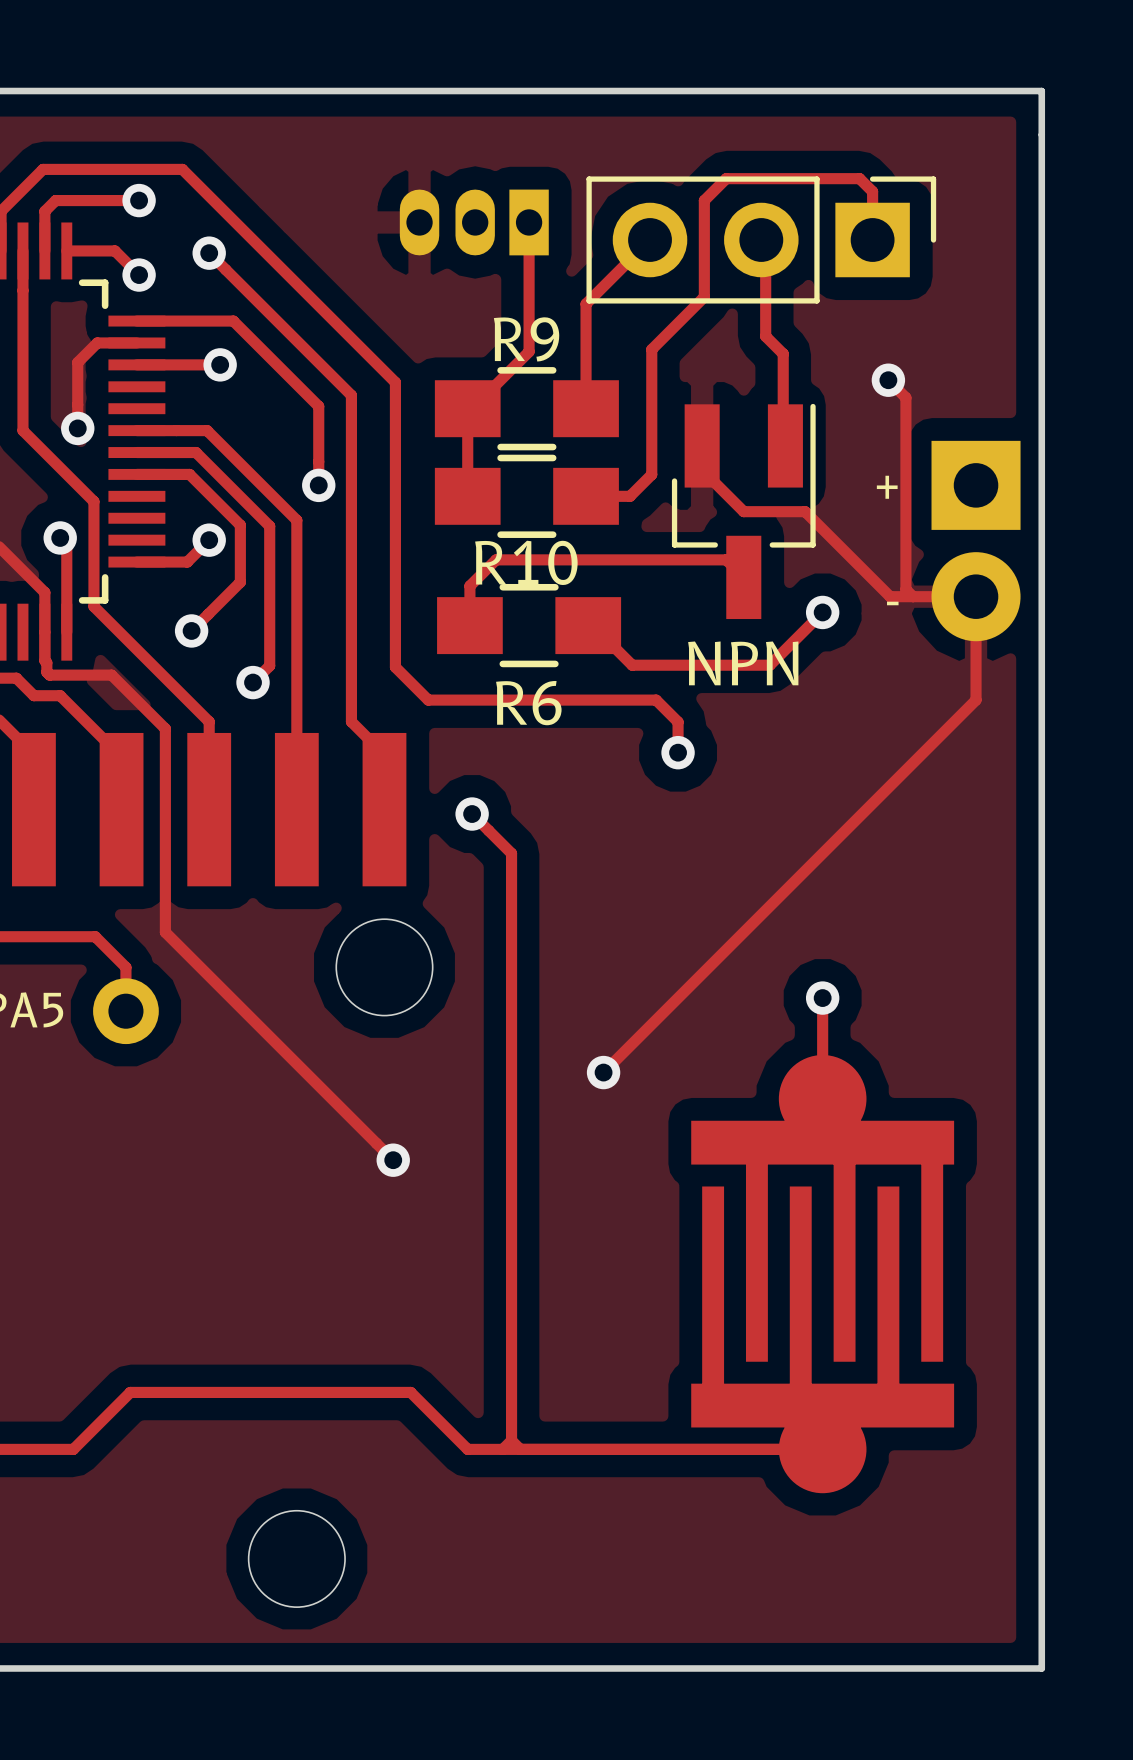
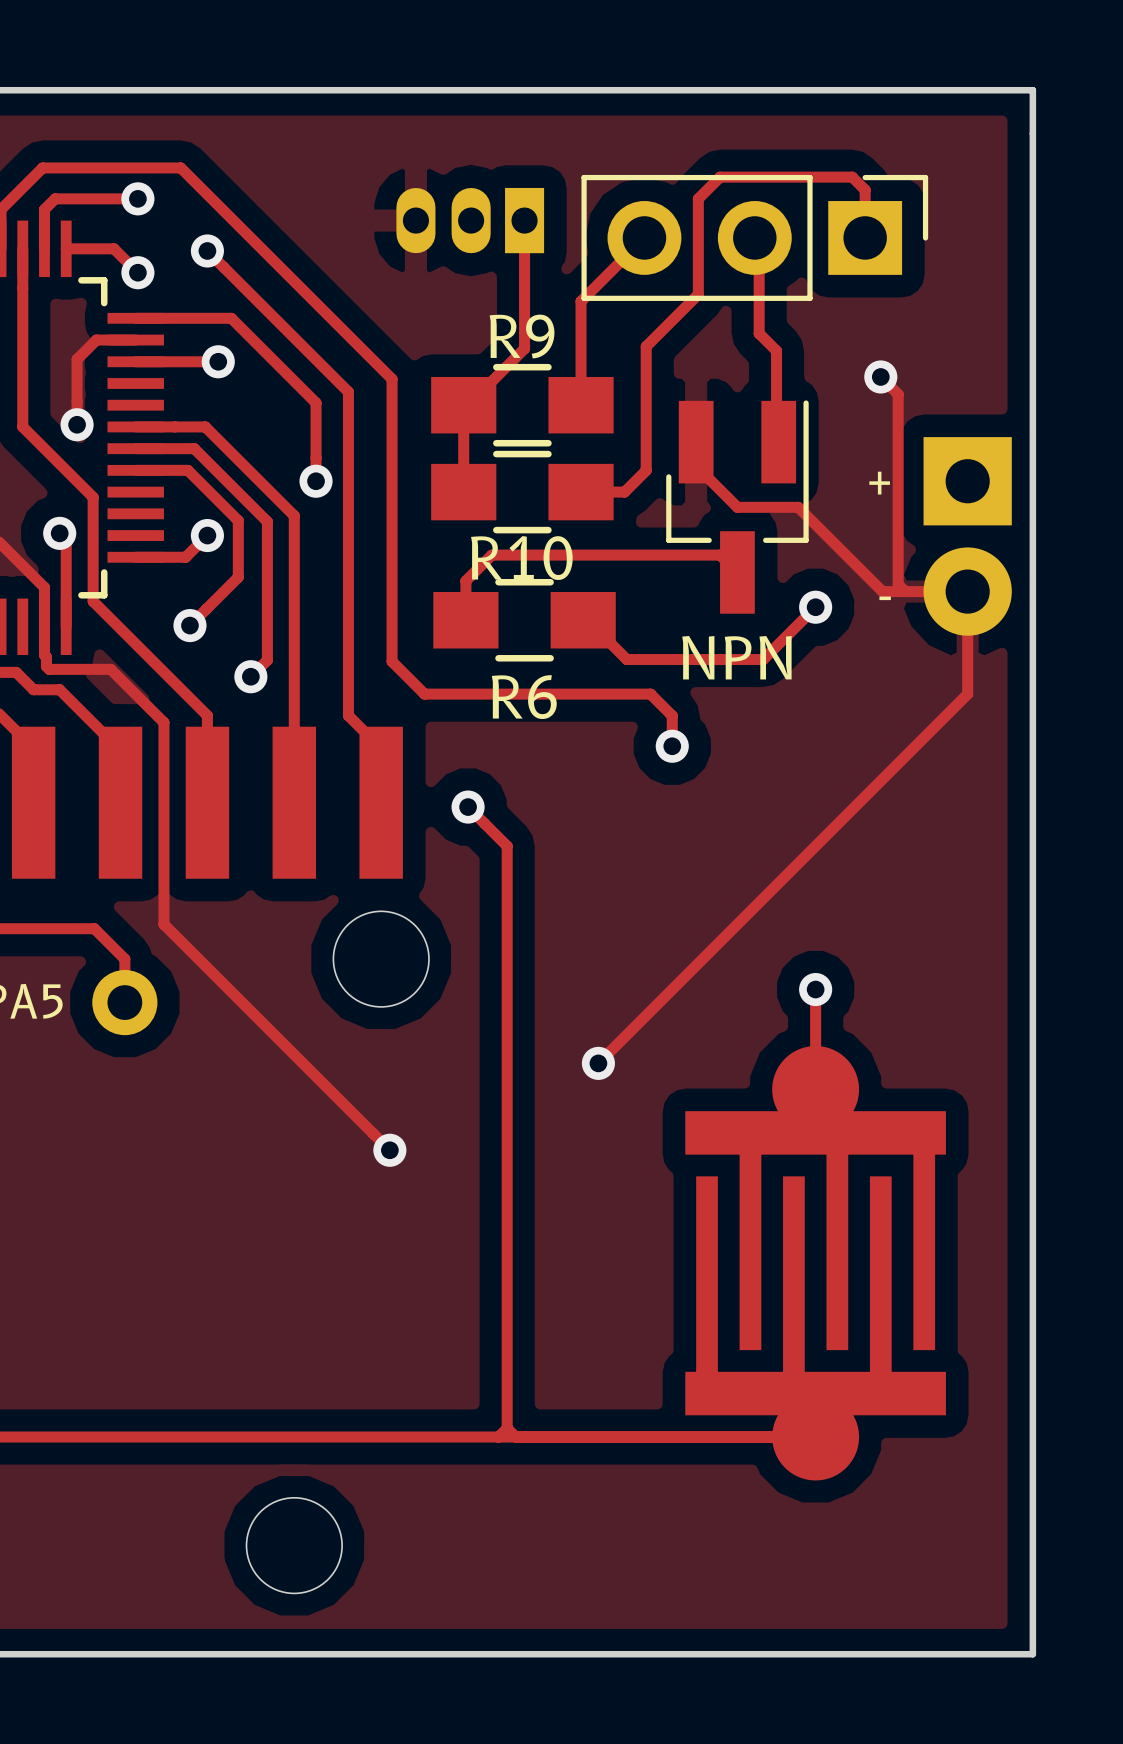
track: (73, 1449) (130, 1392) (410, 1392) (467, 1449) -> (72, 1437) (463, 1437)

